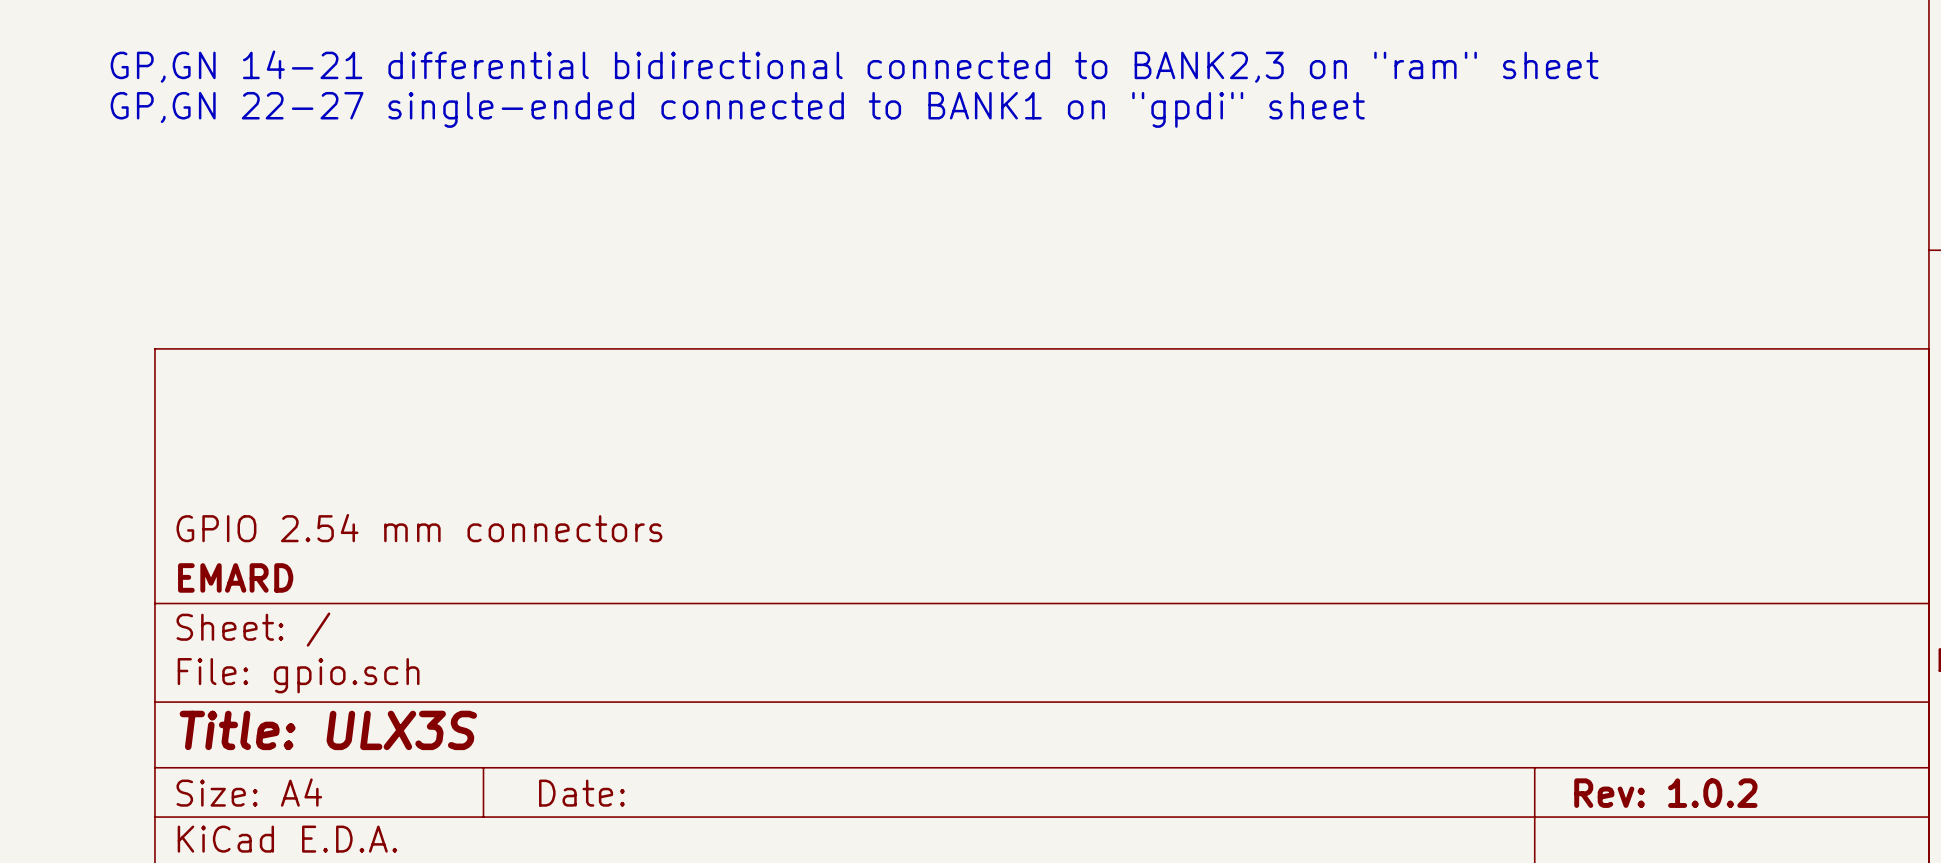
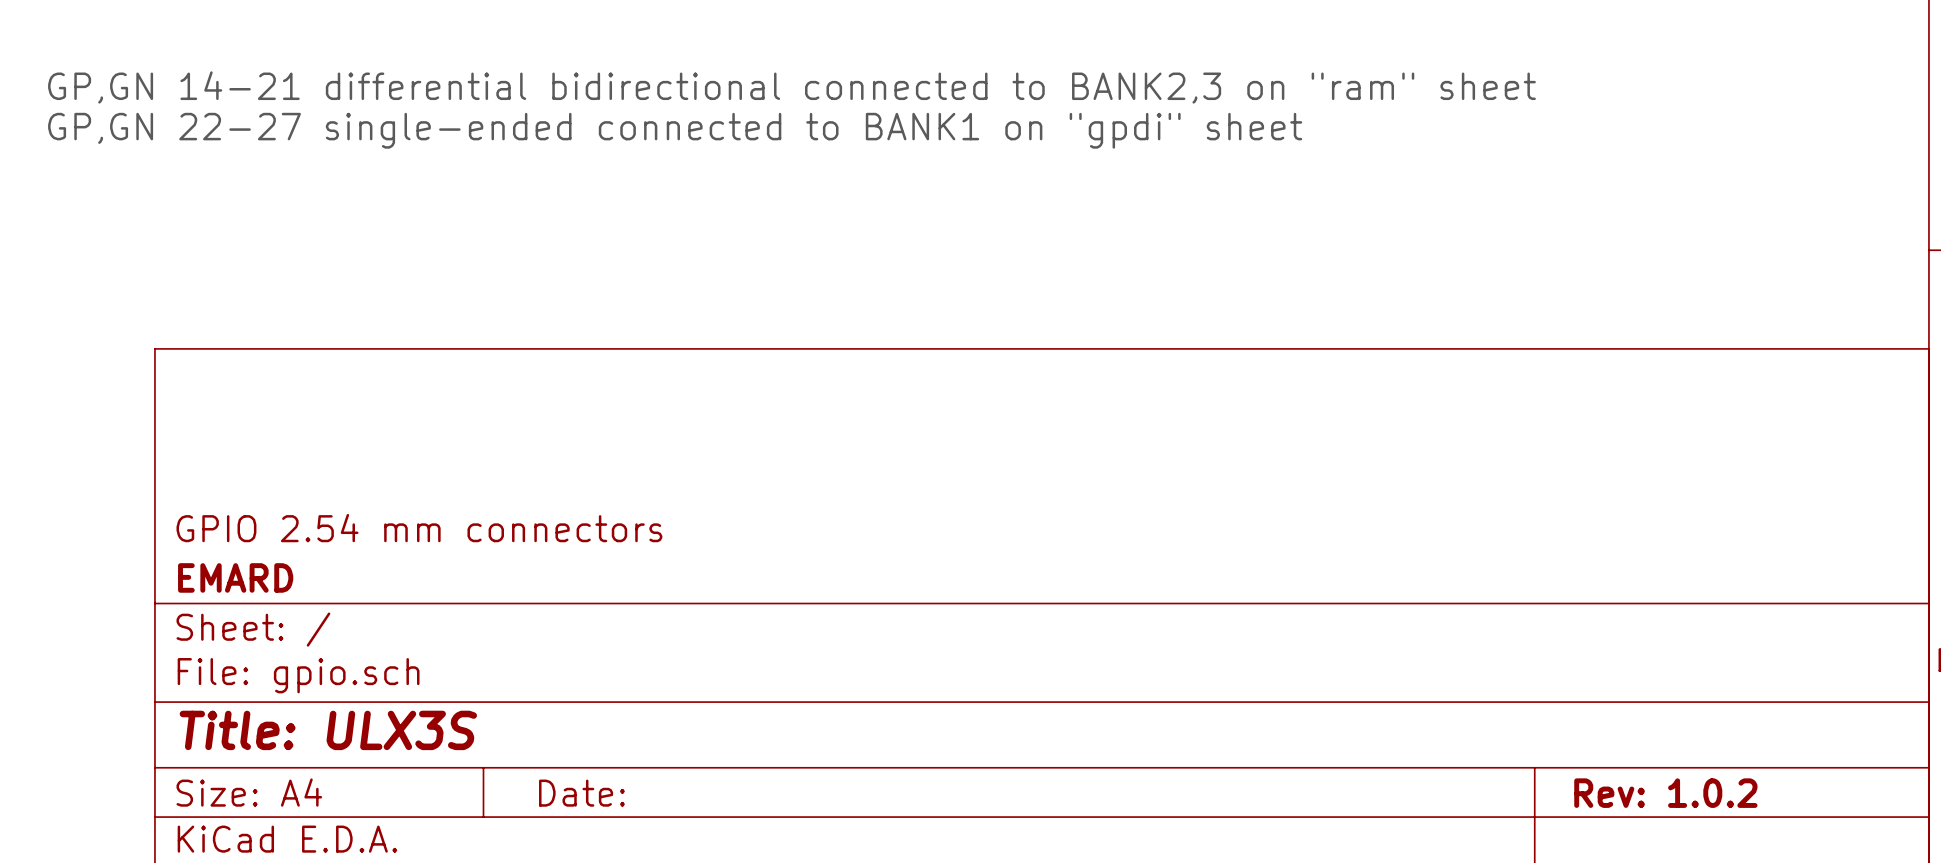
text position: GP,GN 14-21 differential bidirectional connected to BANK2,3 on "ram" sheet (854, 66) -> GP,GN 14-21 differential bidirectional connected to BANK2,3 on "ram" sheet (791, 87)
text position: GP,GN 22-27 single-ended connected to BANK1 on "gpdi" sheet (737, 109) -> GP,GN 22-27 single-ended connected to BANK1 on "gpdi" sheet (675, 130)

